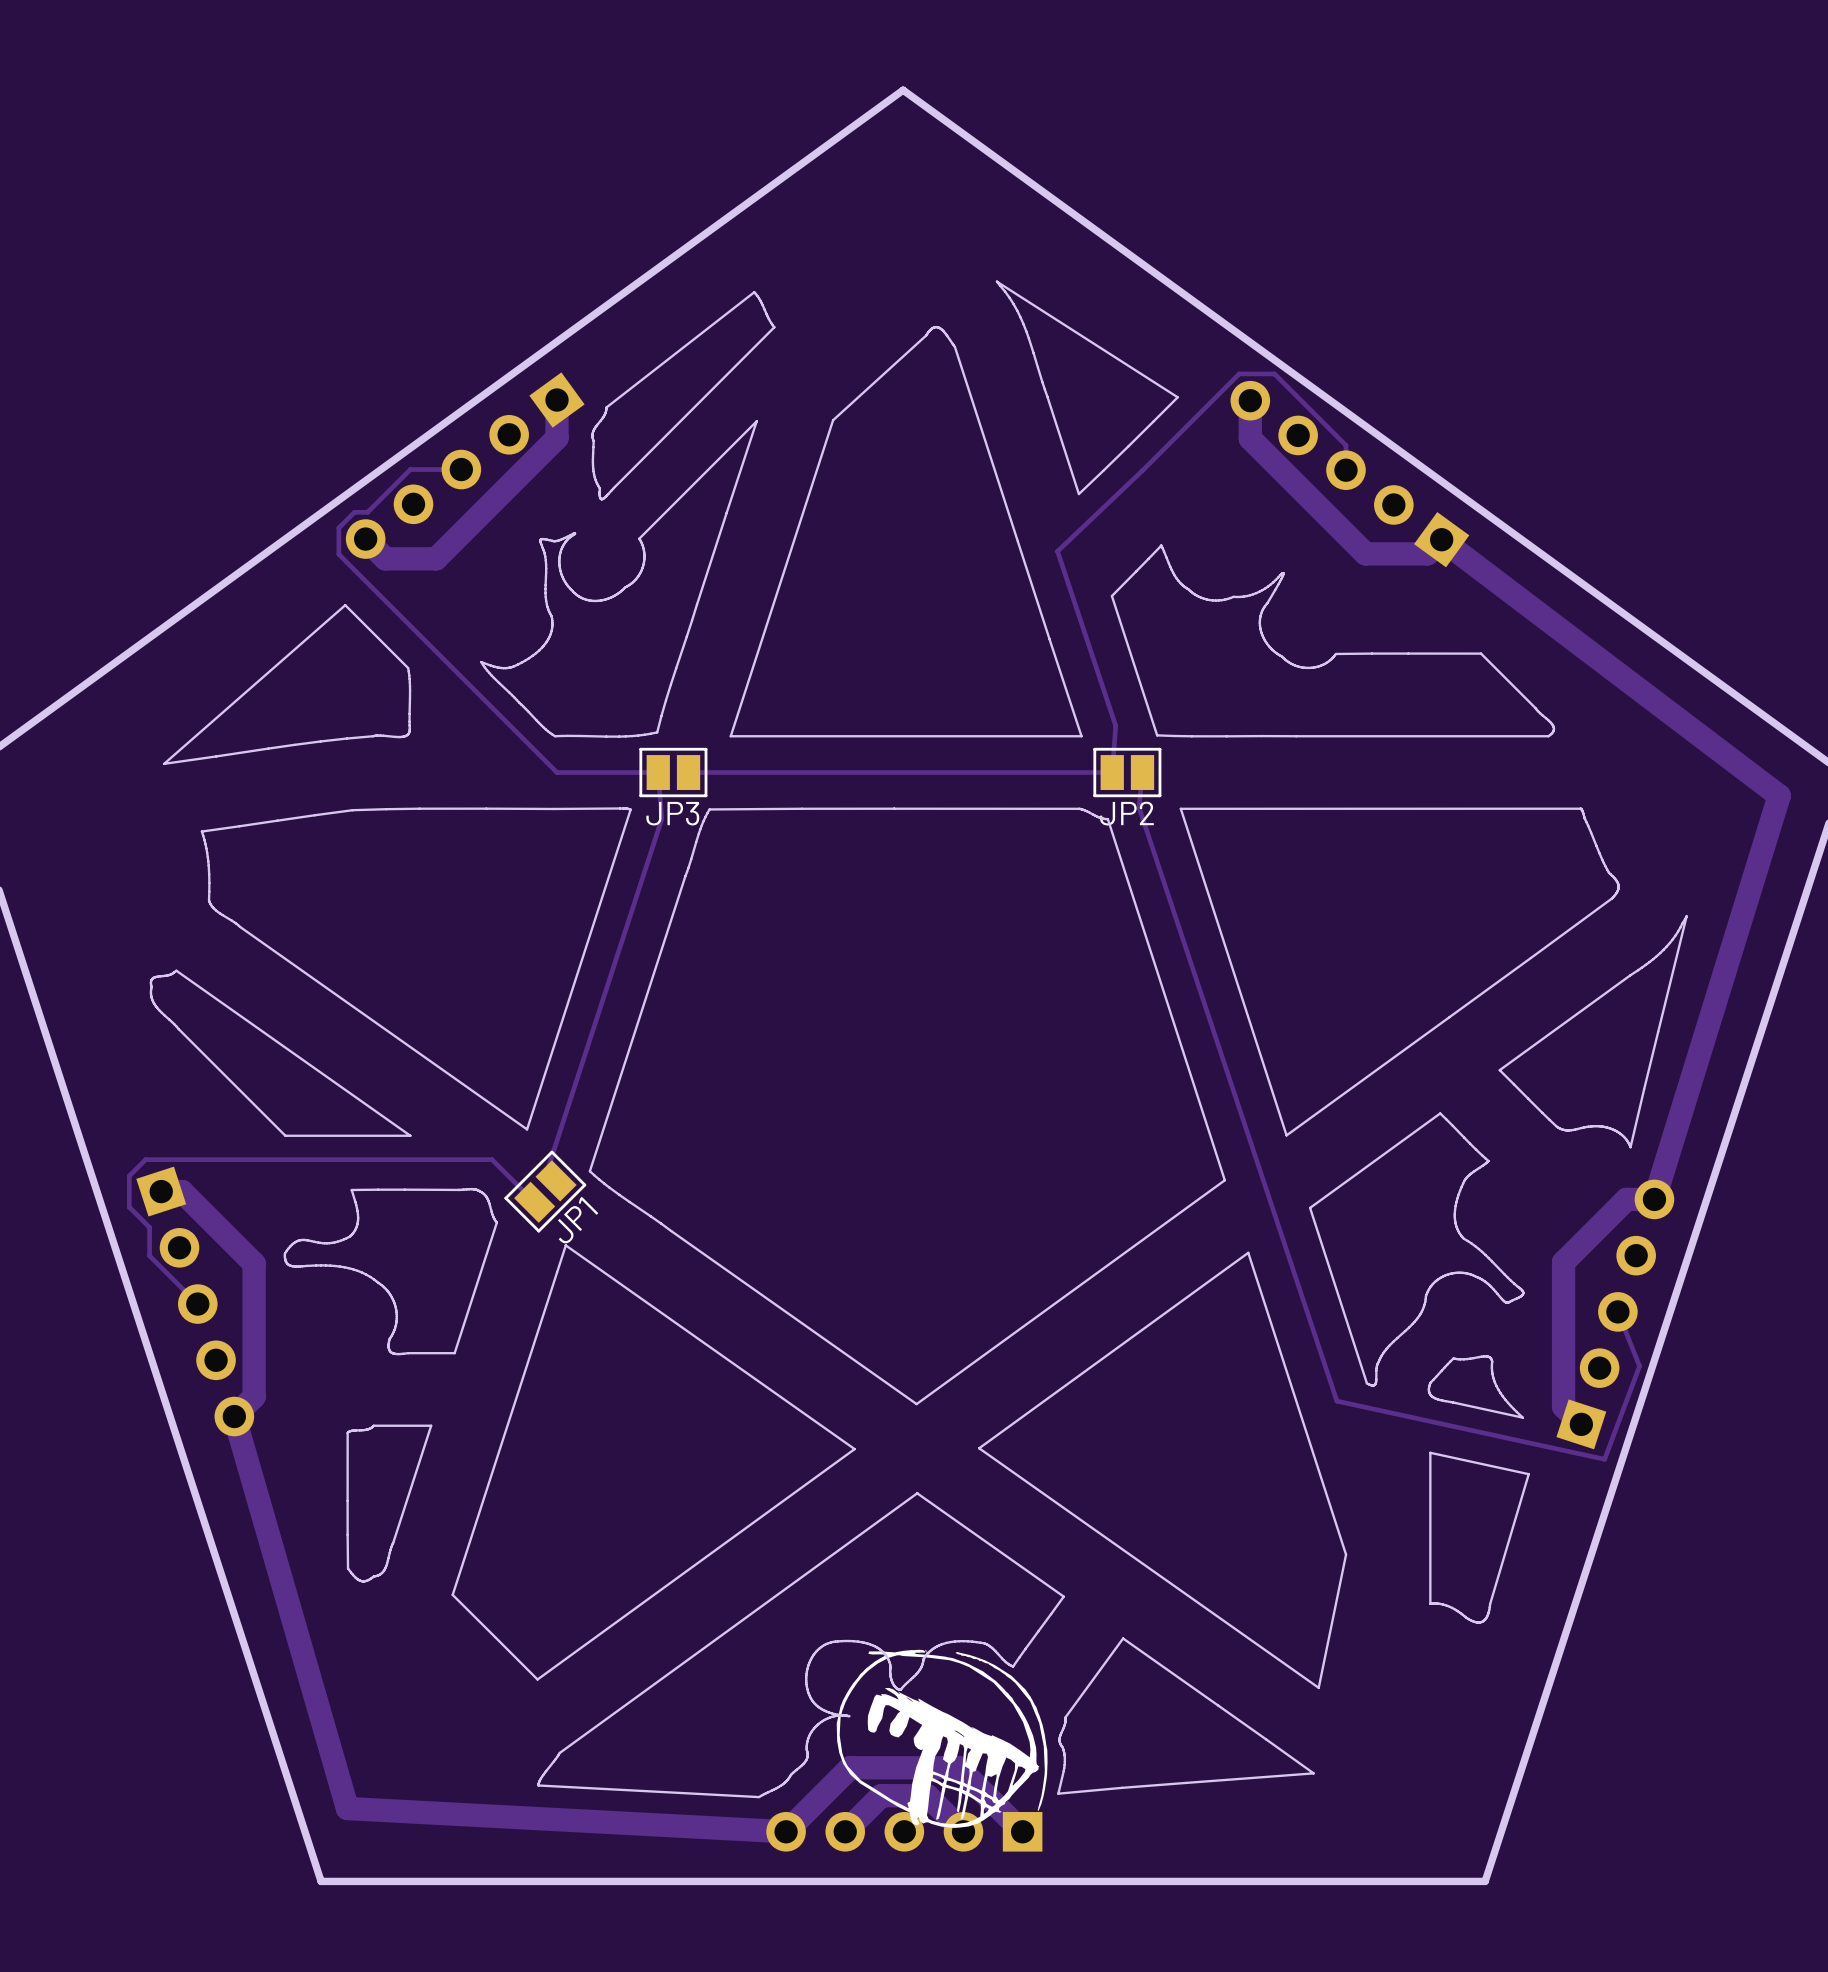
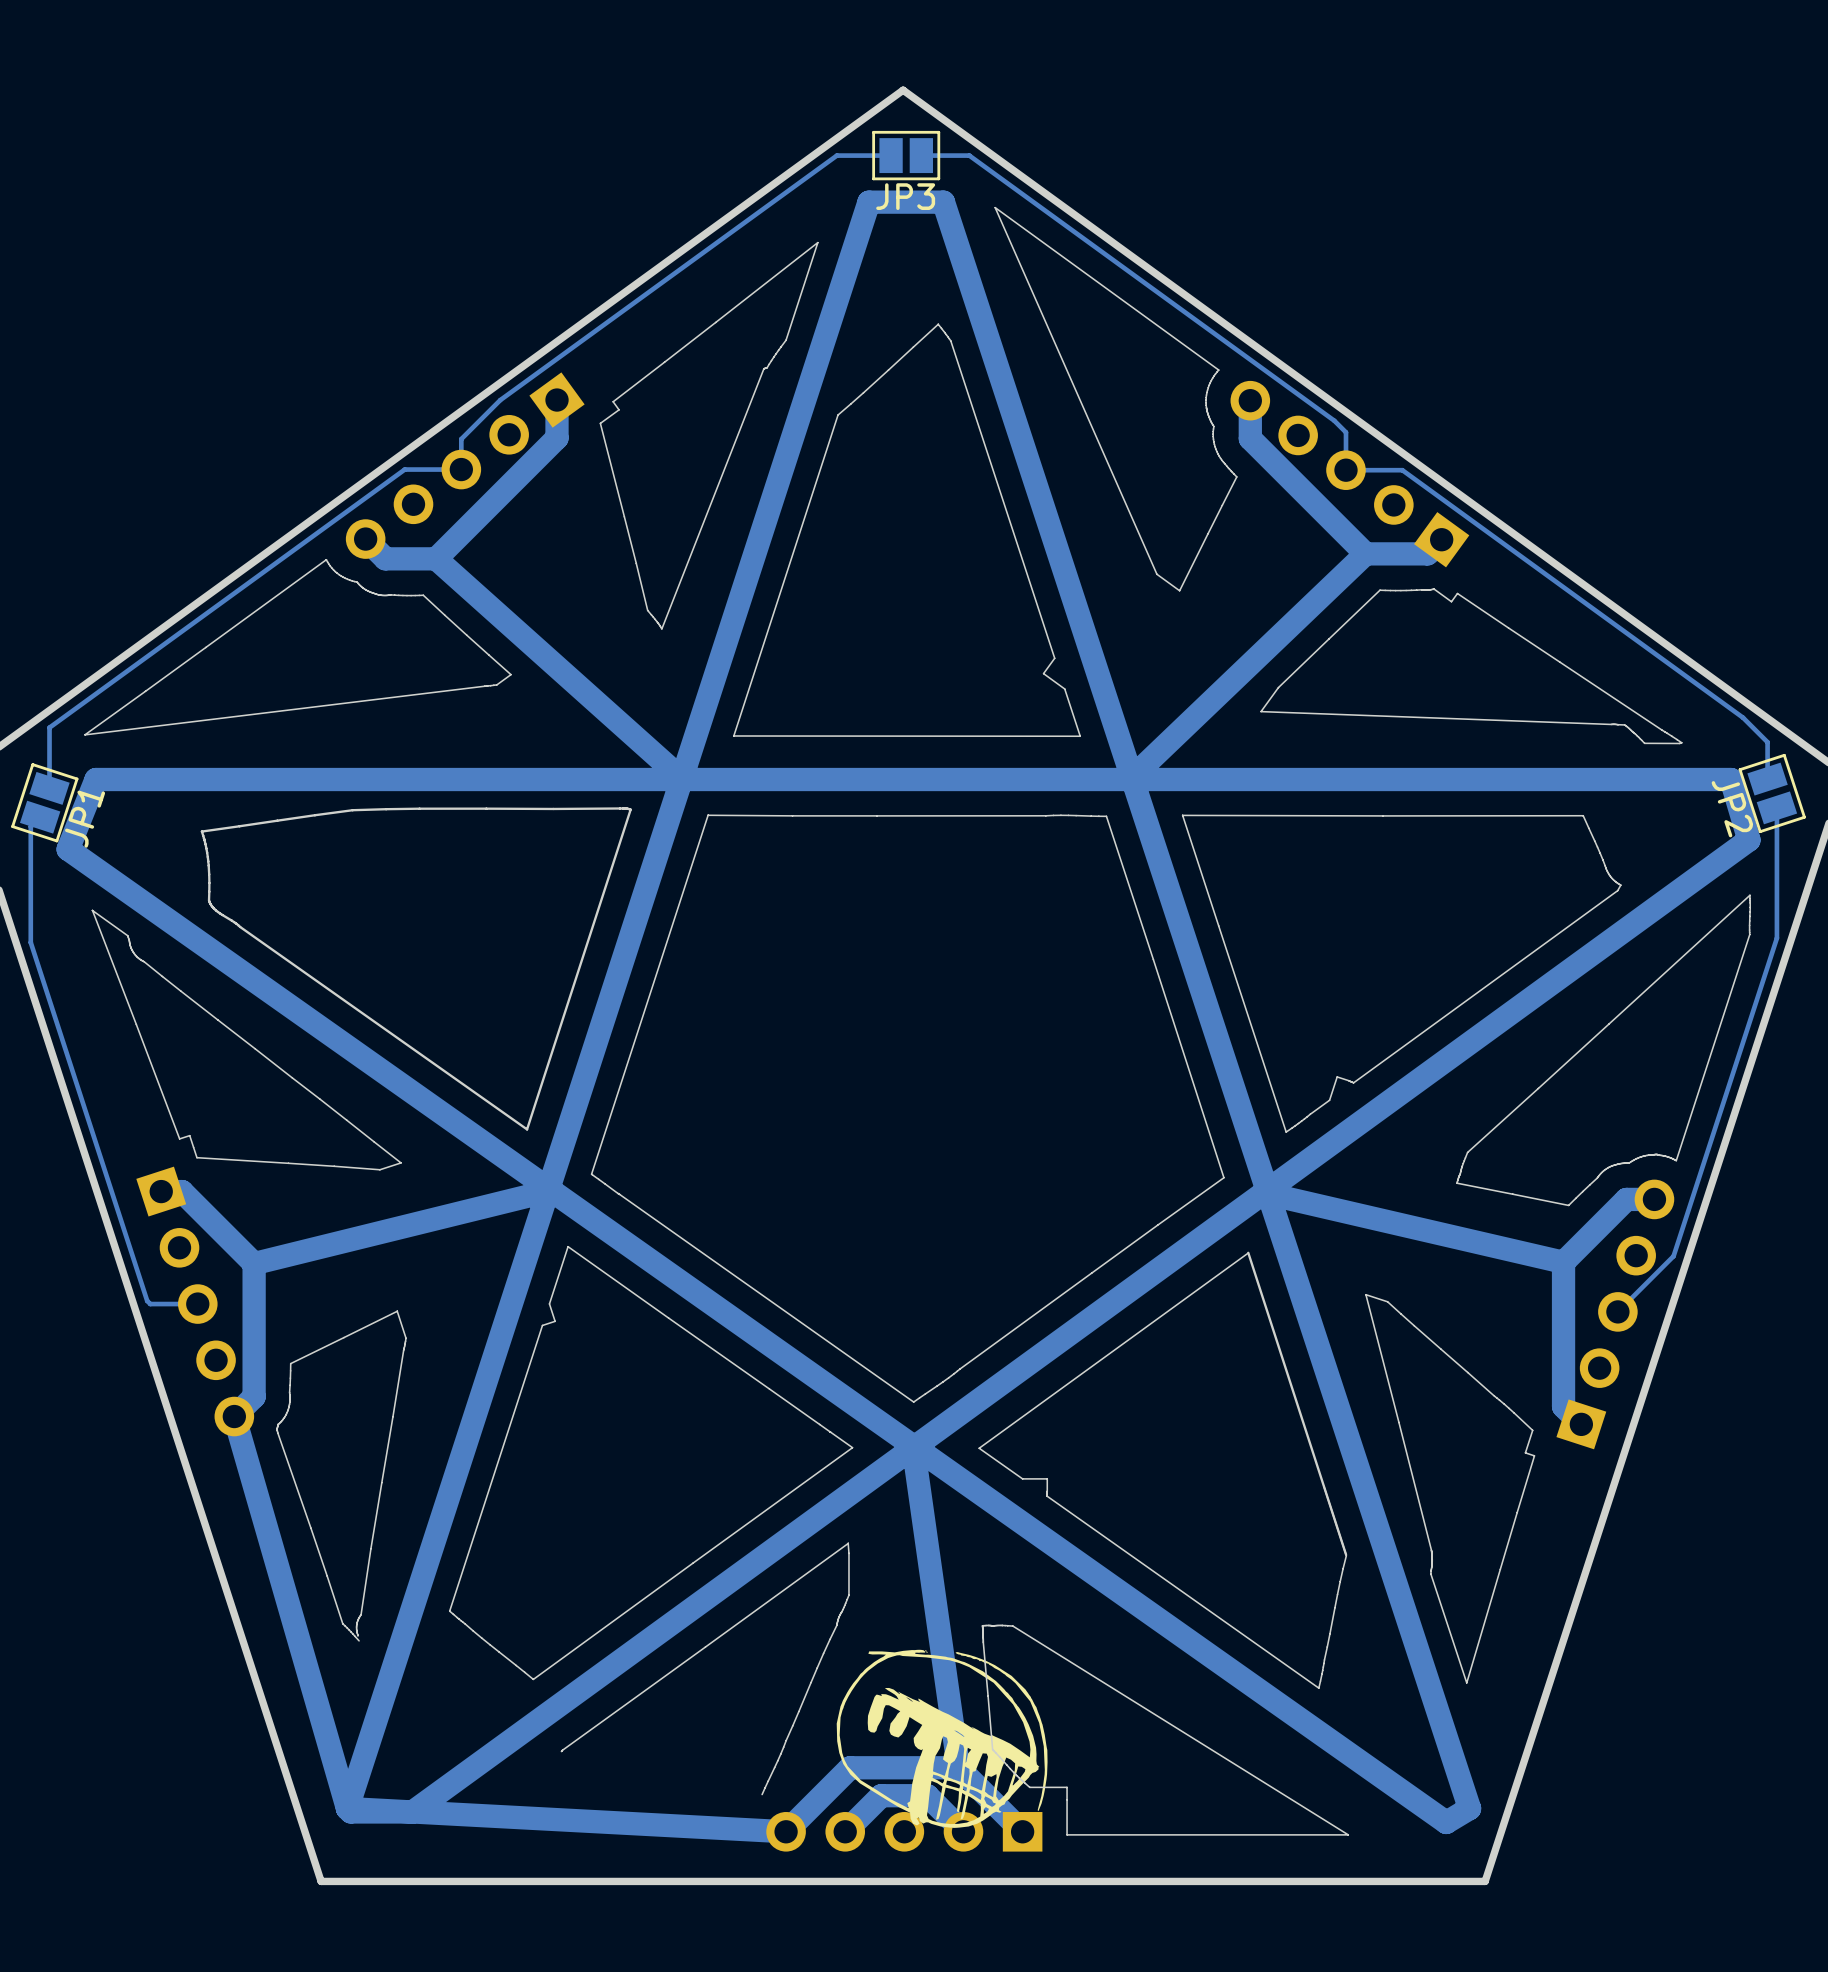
track: none -> (891, 155) (836, 155) (500, 400) (461, 439) (461, 469)
track: none -> (943, 202) (1469, 1808) (1446, 1822) (68, 849) (96, 779) (1731, 779) (1748, 840) (412, 1811) (350, 1811) (347, 1808) (868, 202) (943, 202)
board edge: (996, 281) (1013, 304) (1026, 331) (1078, 494) (1177, 397) (996, 281) -> none
board edge: (937, 327) (943, 331) (954, 346) (1081, 736) (730, 736) (833, 420) (931, 329) (937, 327) -> (938, 324) (950, 340) (1054, 658) (1043, 673) (1064, 689) (1080, 736) (733, 735) (838, 415) (938, 324)
board edge: none -> (767, 367) (786, 340) (817, 242) (613, 401) (619, 409) (600, 423) (647, 610) (661, 628) (763, 368)
board edge: none -> (1206, 407) (1208, 387) (1218, 370) (995, 207) (1156, 574) (1179, 590) (1236, 476) (1216, 451) (1213, 439) (1213, 426) (1206, 408)
track: (1345, 445) (1274, 373) (1239, 373) (1142, 470) (1057, 551) (1115, 725) (1112, 772) (688, 772) -> (1345, 445) (1345, 432) (1334, 420) (969, 155) (921, 155)
track: (410, 469) (367, 512) (354, 512) (338, 527) (338, 554) (557, 772) (658, 772) (661, 819) (545, 1176) -> (410, 469) (404, 469) (49, 727) (49, 788)
track: none -> (1345, 470) (1402, 470) (1743, 717) (1767, 742) (1767, 779)
board edge: (600, 498) (599, 488) (593, 471) (592, 435) (604, 414) (606, 407) (754, 292) (774, 327) (602, 499) -> none
board edge: (574, 533) (556, 541) (541, 539) -> none
board edge: (574, 534) (565, 542) (559, 554) (560, 568) (566, 583) (577, 595) (587, 600) (602, 600) (616, 594) (634, 581) (641, 569) (644, 553) (639, 538) (756, 421) (670, 684) (657, 732) (625, 736) (555, 736) (543, 727) (494, 677) (481, 662) (499, 667) (513, 666) (536, 653) (549, 636) (552, 620) (546, 601) (545, 560) (540, 541) -> none
track: (1441, 539) (1779, 795) (1654, 1199) -> none
track: none -> (1365, 553) (1129, 779)
track: none -> (436, 558) (682, 779)
board edge: (1282, 573) (1268, 586) (1253, 594) (1221, 600) (1206, 599) (1194, 594) (1178, 580) (1161, 545) (1111, 596) (1157, 735) (1548, 736) (1553, 731) (1553, 727) (1550, 722) (1481, 653) (1335, 653) (1327, 662) (1315, 667) (1302, 667) (1289, 662) (1268, 645) (1262, 634) (1259, 625) (1262, 610) (1283, 574) -> none
board edge: none -> (1434, 589) (1451, 601) (1457, 593) (1681, 742) (1644, 743) (1624, 724) (1261, 711) (1278, 687) (1379, 590) (1433, 589)
board edge: none -> (372, 592) (382, 595) (423, 595) (510, 674) (496, 684) (84, 734) (326, 559) (339, 574) (357, 582) (372, 592)
board edge: (345, 605) (408, 668) (409, 729) (407, 735) (399, 737) (376, 735) (320, 741) (164, 763) (345, 605) -> none
JP3 position: (673, 772) -> (906, 155)
JP2 rotation: 0° (1127, 772) -> 72° clockwise (1772, 793)
JP2 position: (1127, 772) -> (1772, 793)
track: (1142, 772) (1139, 807) (1336, 1401) (1604, 1459) (1639, 1366) (1617, 1311) -> (1776, 807) (1776, 938) (1673, 1256) (1617, 1311)
board edge: (1079, 808) (1107, 819) (1224, 1180) (916, 1404) (619, 1194) (589, 1171) (698, 833) (709, 809) (1079, 808) -> none
board edge: (1580, 808) (1180, 808) (1286, 1135) (1613, 896) (1618, 889) (1618, 883) (1603, 862) (1582, 810) -> none
board edge: none -> (1182, 815) (1286, 1132) (1329, 1100) (1337, 1076) (1353, 1082) (1617, 890) (1620, 885) (1607, 872) (1583, 815) (1182, 815)
board edge: (1686, 916) (1630, 1147) (1621, 1135) (1607, 1127) (1592, 1126) (1568, 1130) (1557, 1127) (1499, 1070) (1653, 959) (1672, 939) (1686, 916) -> none
board edge: (176, 970) (410, 1135) (285, 1135) (154, 1004) (151, 995) (151, 979) (170, 974) (176, 970) -> (92, 910) (179, 1138) (189, 1135) (196, 1157) (379, 1169) (401, 1162) (138, 958) (131, 949) (127, 935) (92, 910)
board edge: (1440, 1113) (1488, 1161) (1468, 1175) (1461, 1187) (1455, 1210) (1458, 1230) (1463, 1238) (1485, 1254) (1521, 1289) (1523, 1293) (1506, 1302) (1485, 1282) (1471, 1274) (1456, 1272) (1439, 1278) (1428, 1290) (1423, 1306) (1417, 1317) (1381, 1355) (1376, 1366) (1375, 1382) (1371, 1385) (1366, 1383) (1310, 1207) (1440, 1113) -> none
board edge: none -> (1651, 1154) (1607, 1167) (1568, 1205) (1457, 1183) (1467, 1152) (1749, 895) (1749, 934) (1676, 1160) (1658, 1155)
board edge: none -> (1654, 1154) (1653, 1154)
board edge: (472, 1189) (478, 1190) (486, 1196) (496, 1222) (454, 1353) (392, 1352) (389, 1349) (388, 1344) (395, 1326) (396, 1310) (391, 1297) (383, 1286) (366, 1274) (348, 1268) (325, 1265) (294, 1266) (285, 1261) (284, 1253) (298, 1240) (332, 1242) (343, 1239) (352, 1234) (356, 1226) (358, 1217) (351, 1189) (472, 1189) -> none
track: none -> (551, 1190) (254, 1263)
JP1 rotation: 0° (545, 1191) -> 27° counterclockwise (44, 802)
JP1 position: (545, 1191) -> (44, 802)
track: none -> (1263, 1192) (1563, 1262)
board edge: none -> (618, 1193) (591, 1174) (708, 815) (1106, 816) (1223, 1177) (913, 1402) (619, 1194)
track: (534, 1202) (492, 1159) (145, 1159) (129, 1175) (129, 1207) (149, 1227) (149, 1255) (197, 1304) -> (40, 817) (30, 826) (30, 942) (147, 1300) (150, 1304) (197, 1304)
board edge: (565, 1245) (452, 1594) (537, 1679) (854, 1449) (565, 1245) -> (830, 1431) (568, 1246) (549, 1303) (555, 1321) (542, 1325) (449, 1611) (533, 1679) (852, 1447) (830, 1432)
board edge: (1248, 1252) (979, 1448) (1318, 1687) (1346, 1554) -> (1248, 1253) (979, 1448) (1022, 1478) (1047, 1478) (1046, 1495) (1318, 1688) (1346, 1555) (1323, 1486)
board edge: (1486, 1356) (1491, 1360) (1492, 1376) (1498, 1389) (1522, 1417) (1440, 1400) (1429, 1393) (1430, 1382) (1453, 1358) (1486, 1356) -> none
board edge: none -> (278, 1424) (285, 1415) (289, 1406) (290, 1363) (397, 1311) (406, 1338) (361, 1614) (356, 1623) (358, 1635)
board edge: none -> (278, 1424) (277, 1433) (342, 1623) (359, 1640)
board edge: (431, 1425) (385, 1568) (381, 1573) (368, 1579) (359, 1580) (348, 1568) (347, 1432) (367, 1429) (373, 1425) (431, 1425) -> none
track: none -> (913, 1447) (958, 1767)
board edge: (1430, 1452) (1528, 1474) (1488, 1613) (1480, 1622) (1470, 1620) (1447, 1605) (1430, 1603) (1430, 1452) -> none
board edge: (917, 1493) (1063, 1596) (1013, 1666) (984, 1643) (963, 1641) (946, 1642) (928, 1652) (918, 1671) (899, 1689) (895, 1687) (891, 1681) (887, 1658) (878, 1648) (858, 1641) (830, 1642) (819, 1648) (811, 1658) (806, 1673) (807, 1689) (811, 1699) (819, 1707) (831, 1713) (840, 1715) (843, 1715) (849, 1716) (831, 1716) (816, 1725) (808, 1738) (807, 1756) (804, 1762) (782, 1784) (759, 1797) (538, 1785) (542, 1776) (559, 1752) (917, 1493) -> none
board edge: none -> (1431, 1550) (1365, 1294) (1387, 1301) (1532, 1430) (1525, 1452) (1534, 1455) (1466, 1682) (1430, 1574) (1431, 1553)
board edge: (1123, 1638) (1266, 1739) (1313, 1773) (1058, 1793) (1064, 1761) (1059, 1738) (1065, 1717) (1123, 1638) -> (1005, 1625) (1012, 1626) (1348, 1834) (1067, 1834) (1067, 1787) (1029, 1787) (992, 1749) (982, 1625) (1005, 1625)
board edge: none -> (562, 1750) (848, 1543) (848, 1595) (762, 1794)

